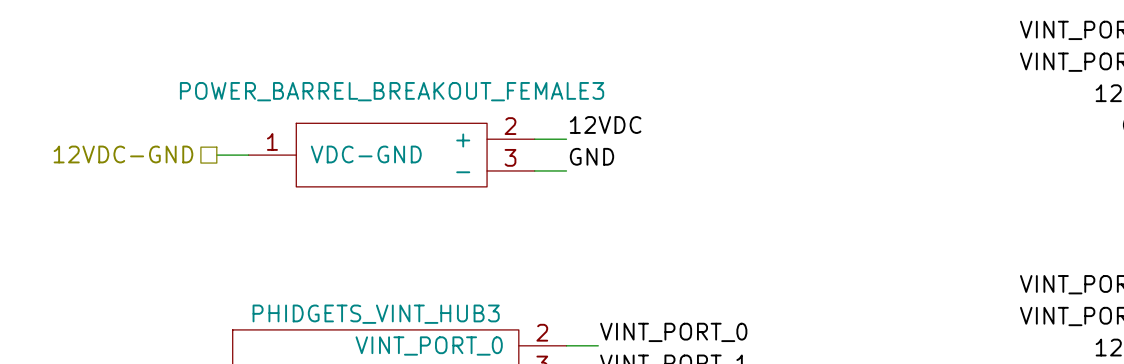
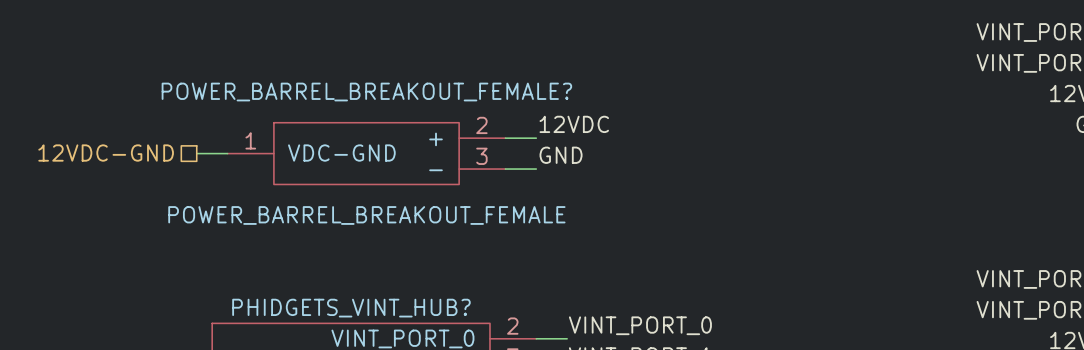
POWER_BARREL_BREAKOUT_FEMALE3 name: POWER_BARREL_BREAKOUT_FEMALE3 (392, 91) -> POWER_BARREL_BREAKOUT_FEMALE? (366, 92)
POWER_BARREL_BREAKOUT_FEMALE3 value: none -> POWER_BARREL_BREAKOUT_FEMALE (366, 215)
PHIDGETS_VINT_HUB3 name: PHIDGETS_VINT_HUB3 (376, 314) -> PHIDGETS_VINT_HUB? (351, 308)

